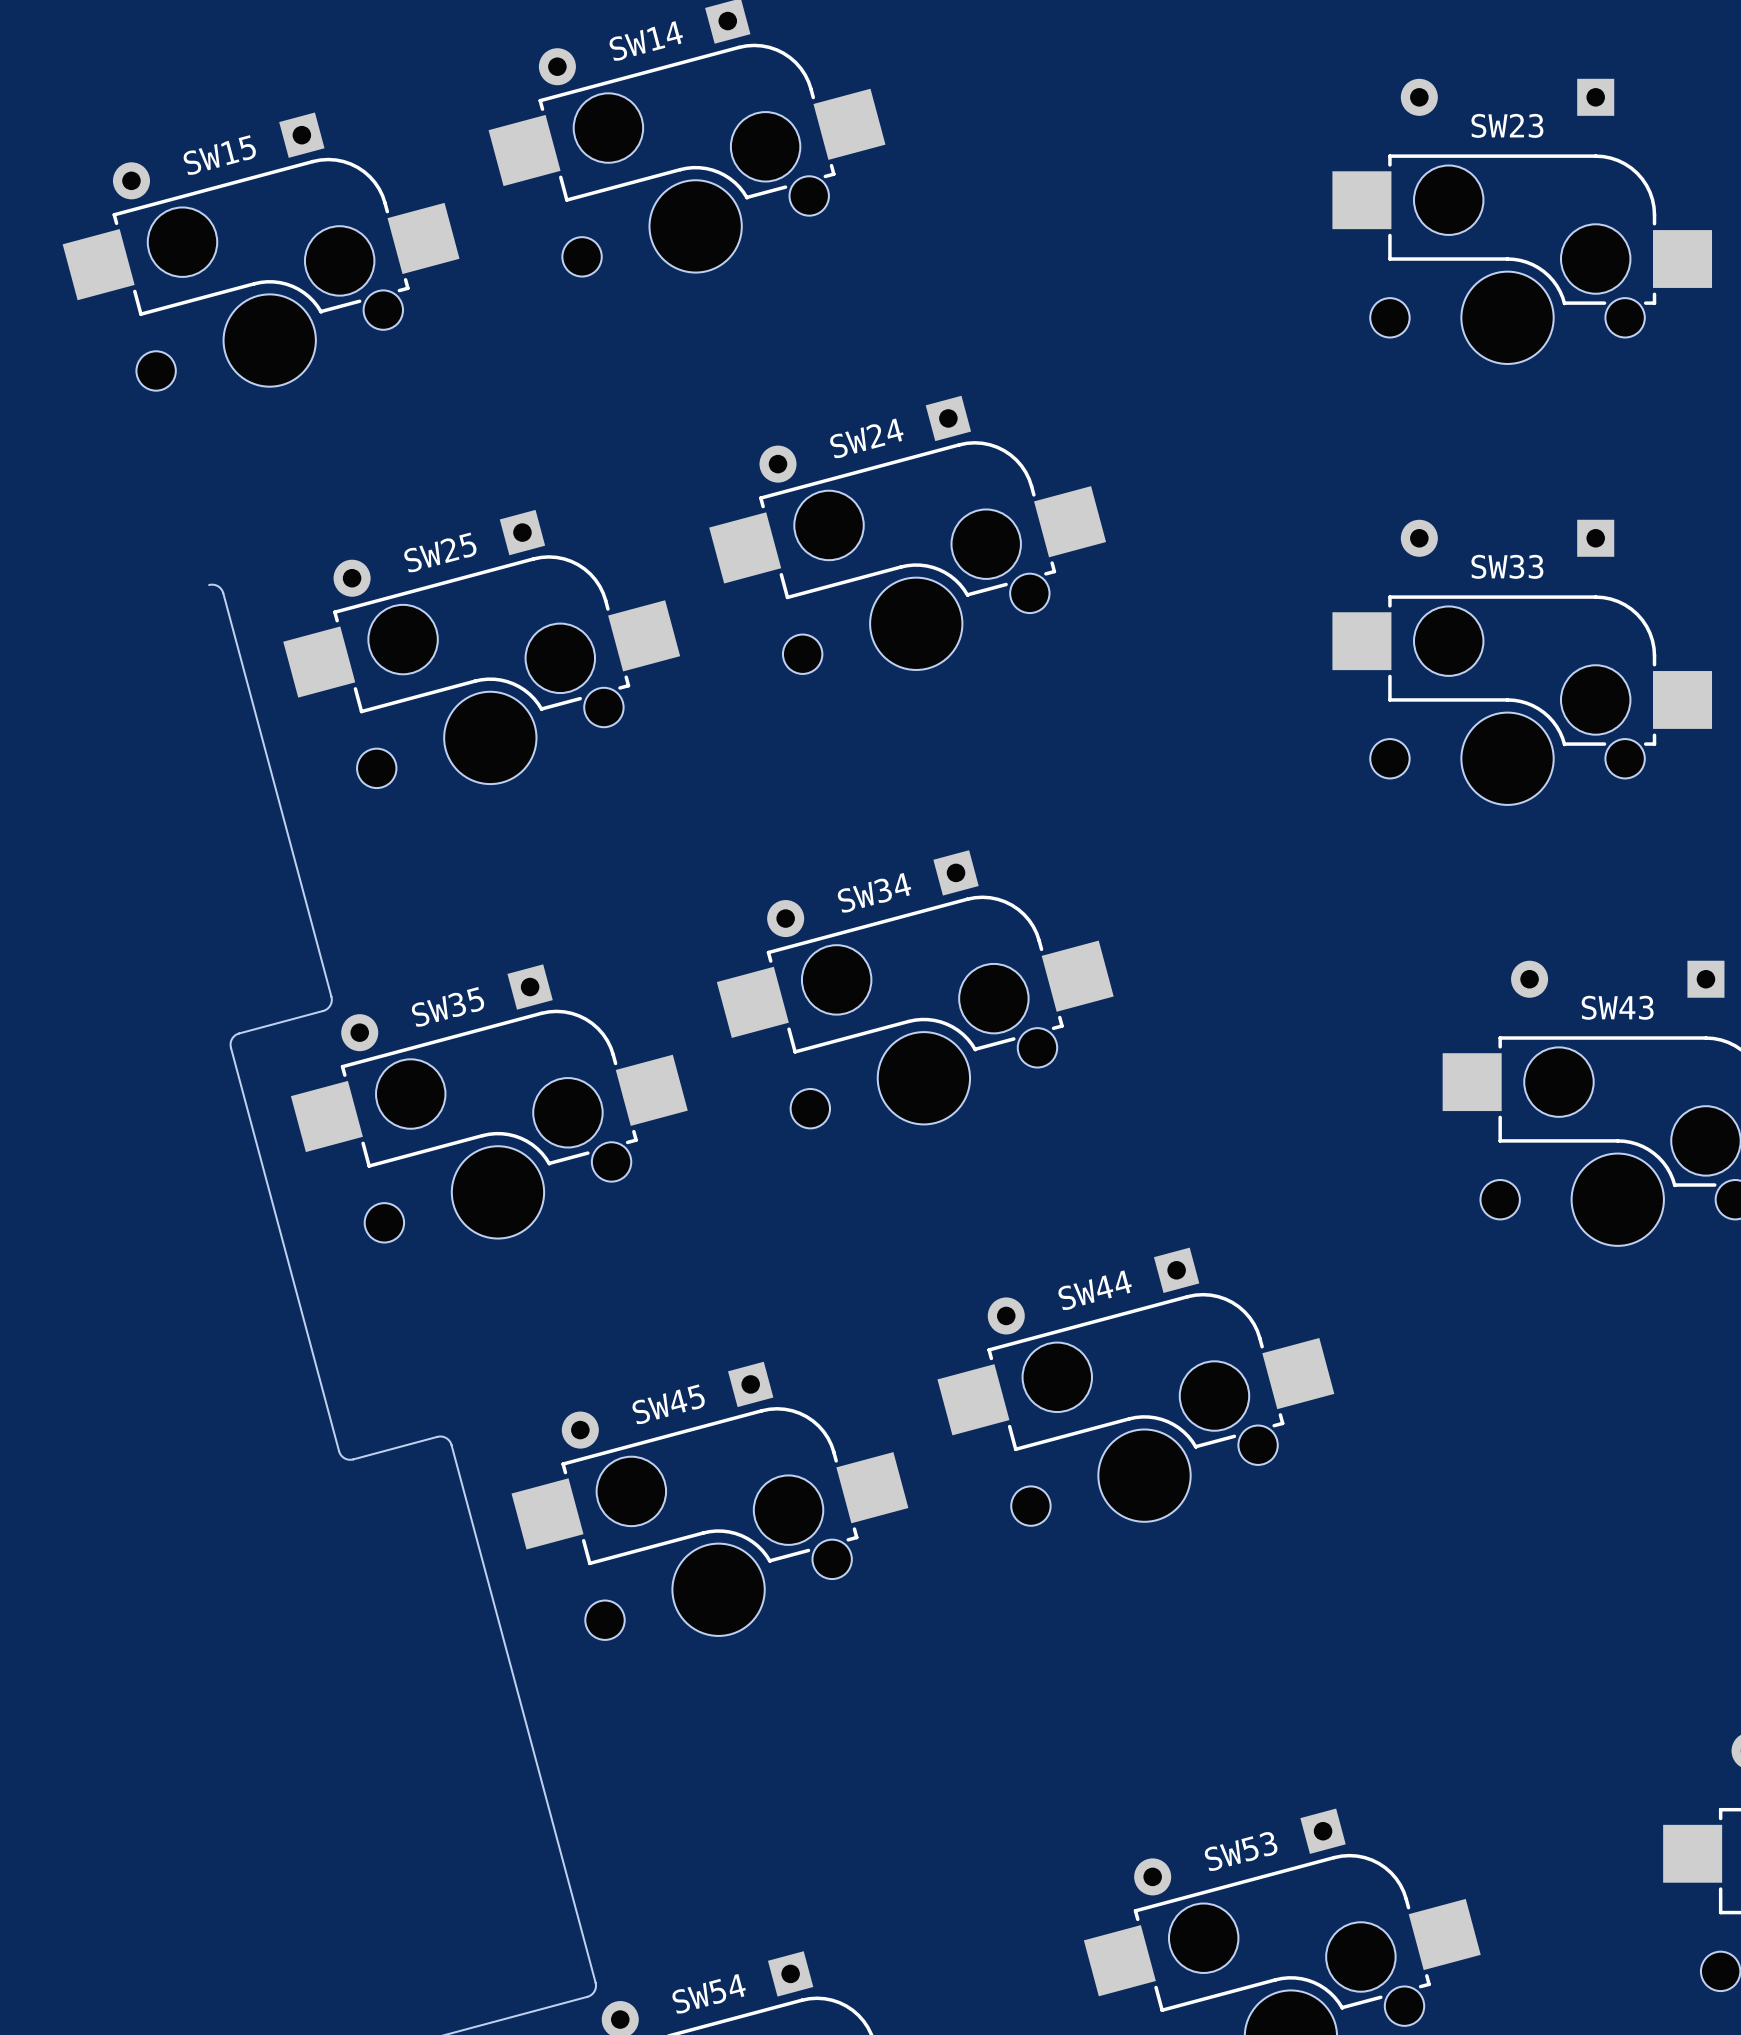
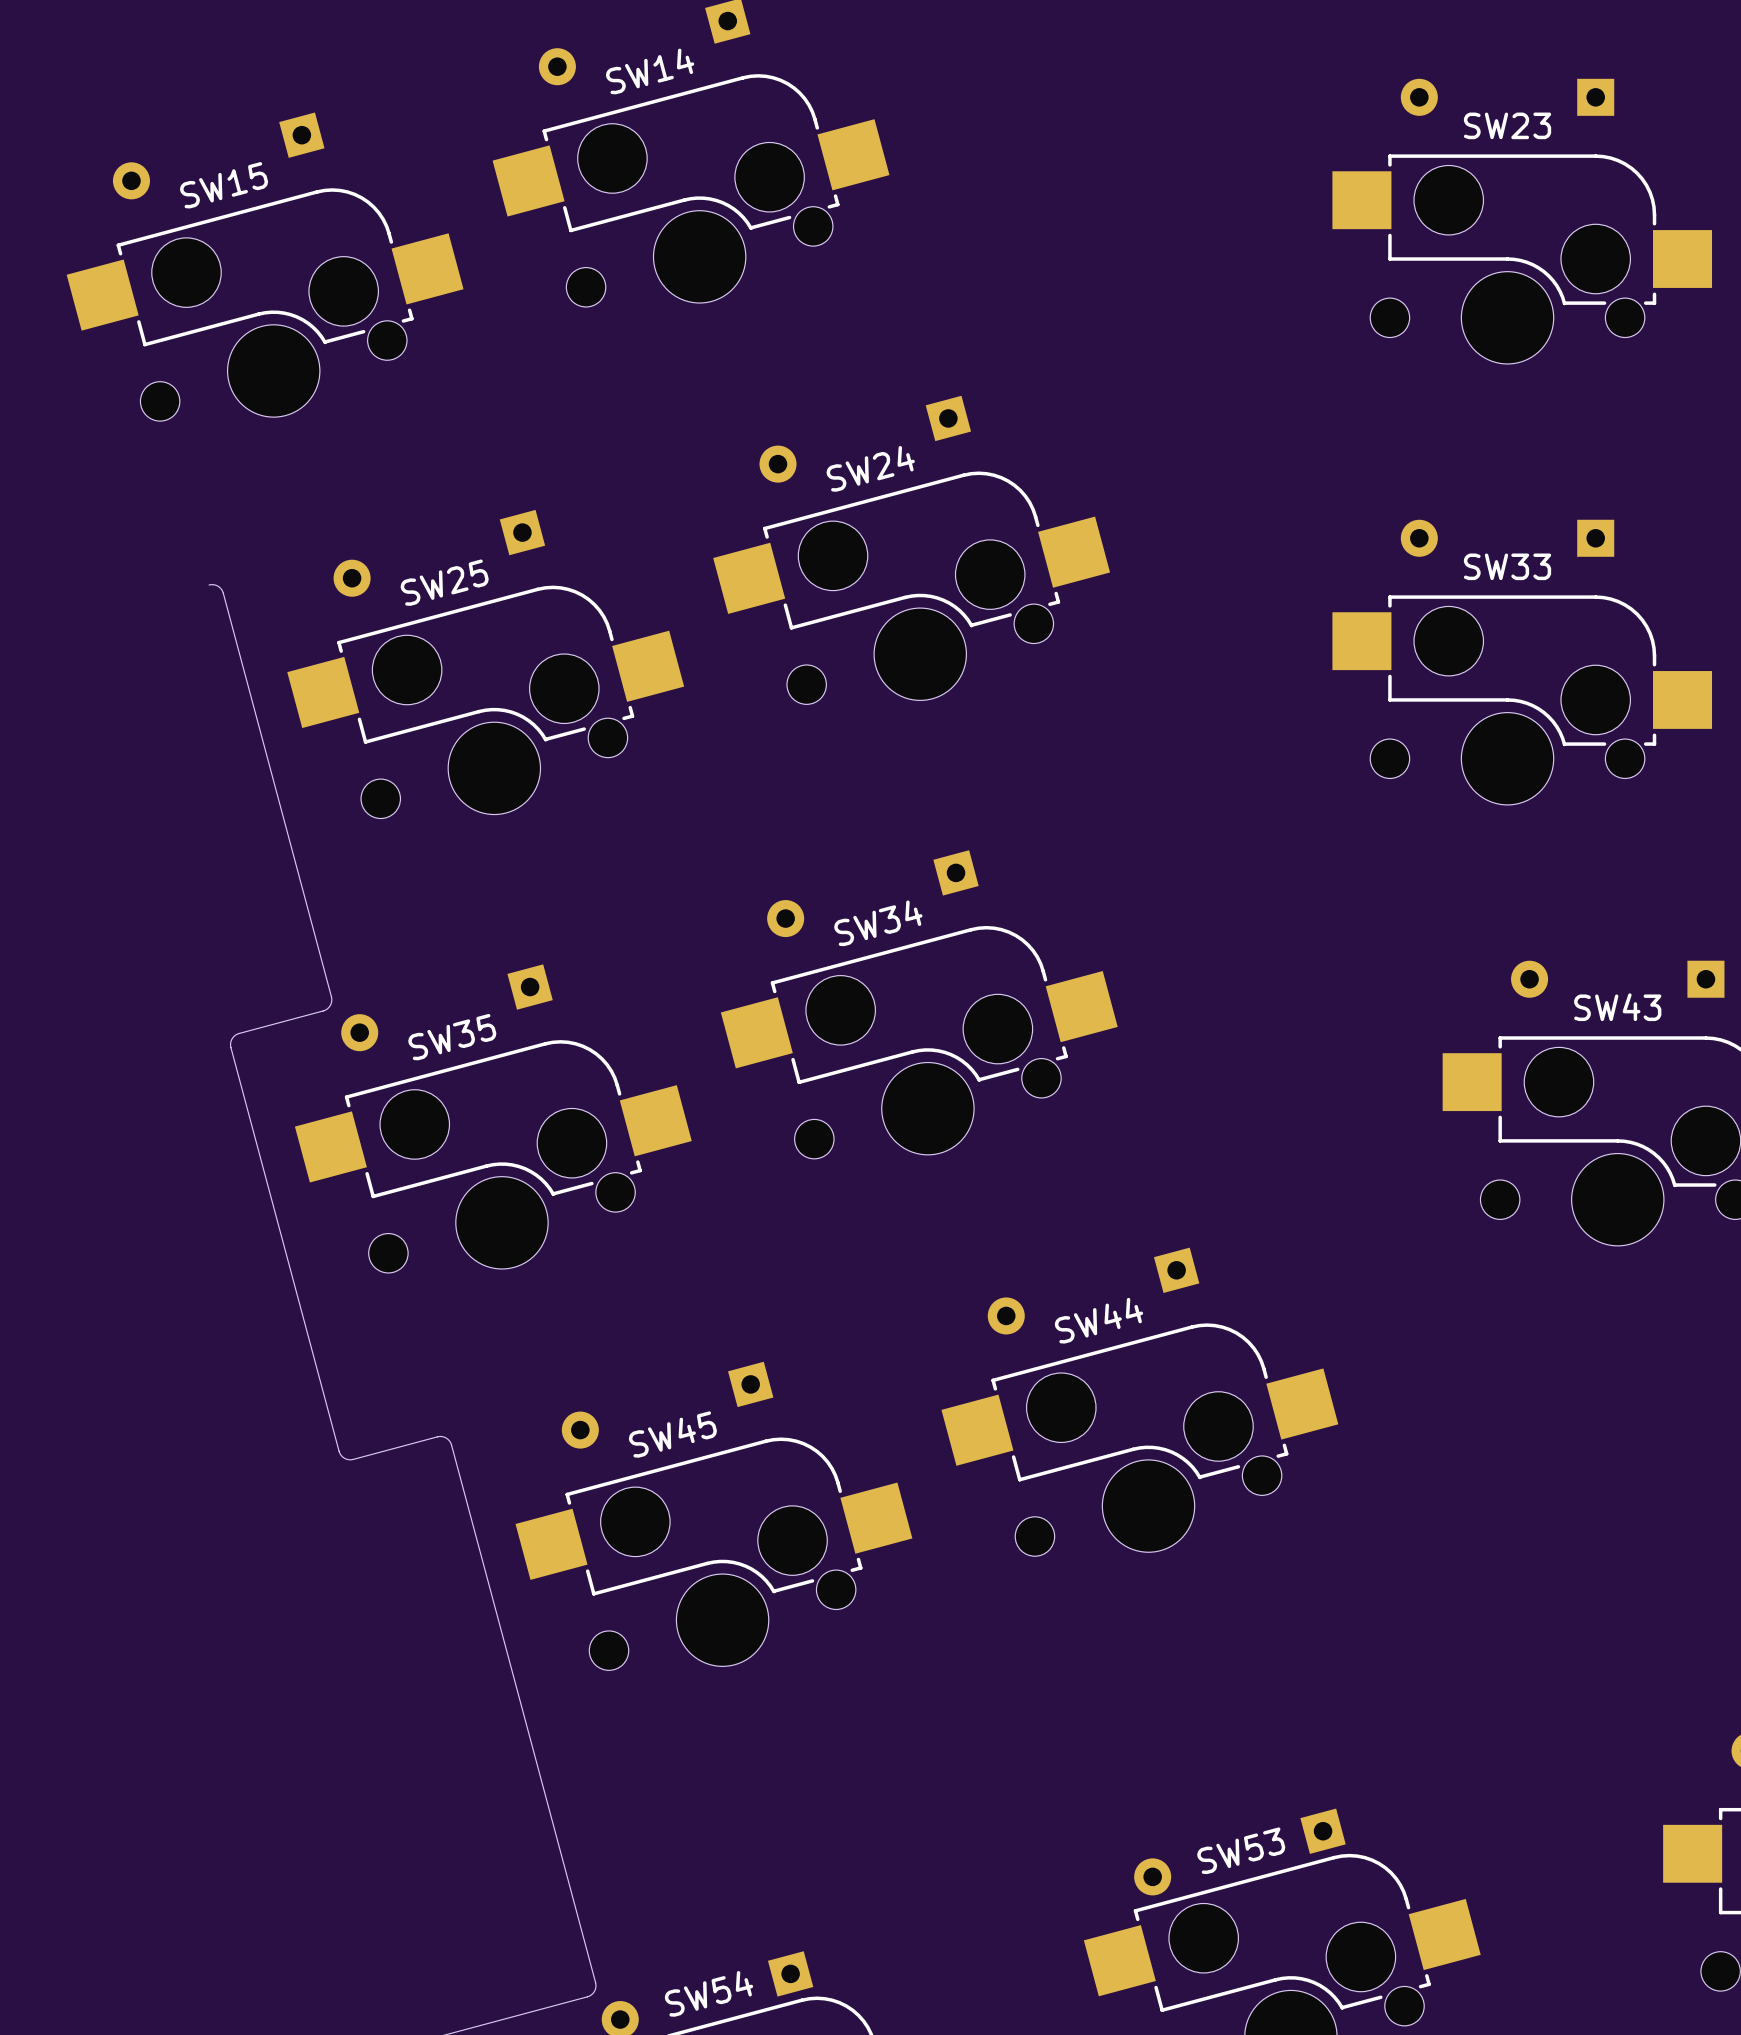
SW14 position: (687, 160) -> (691, 190)
SW15 position: (261, 274) -> (265, 304)
SW24 position: (907, 557) -> (911, 587)
SW25 position: (481, 671) -> (485, 702)
SW34 position: (915, 1011) -> (919, 1042)
SW35 position: (489, 1126) -> (493, 1156)
SW44 position: (1135, 1409) -> (1139, 1439)
SW45 position: (709, 1523) -> (713, 1553)

